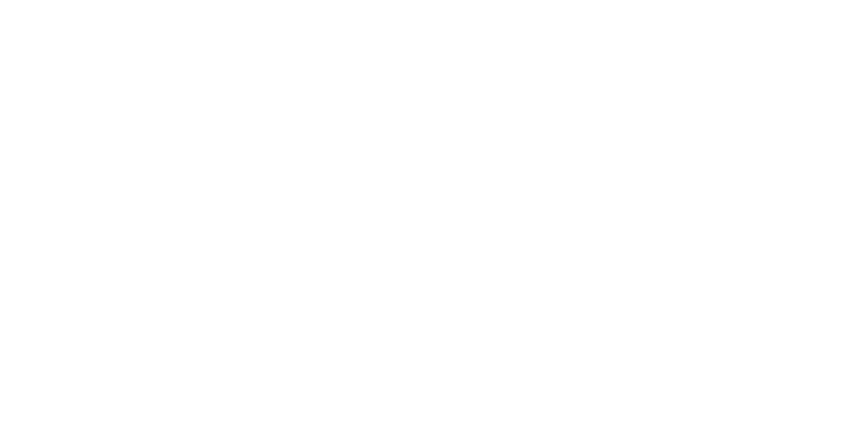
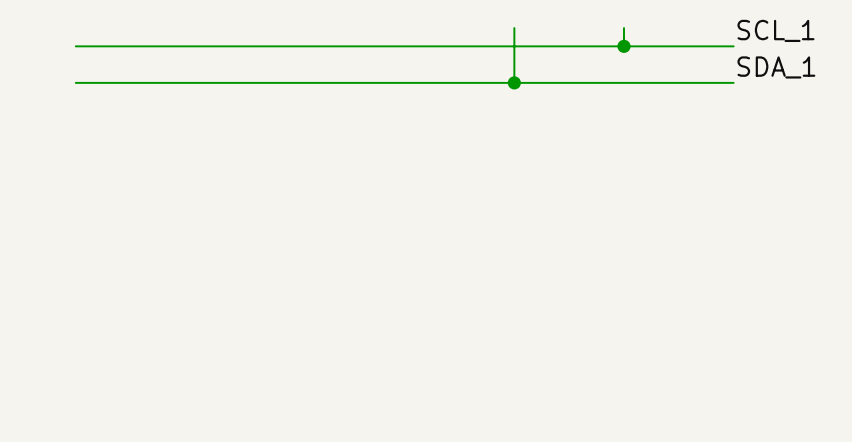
wire: none -> (514, 28) (514, 82)
wire: none -> (623, 28) (623, 46)
label: none -> SCL_1 (775, 30)
wire: none -> (75, 46) (733, 46)
junction: none -> (623, 46)
label: none -> SDA_1 (776, 67)
wire: none -> (75, 82) (733, 82)
junction: none -> (514, 82)

